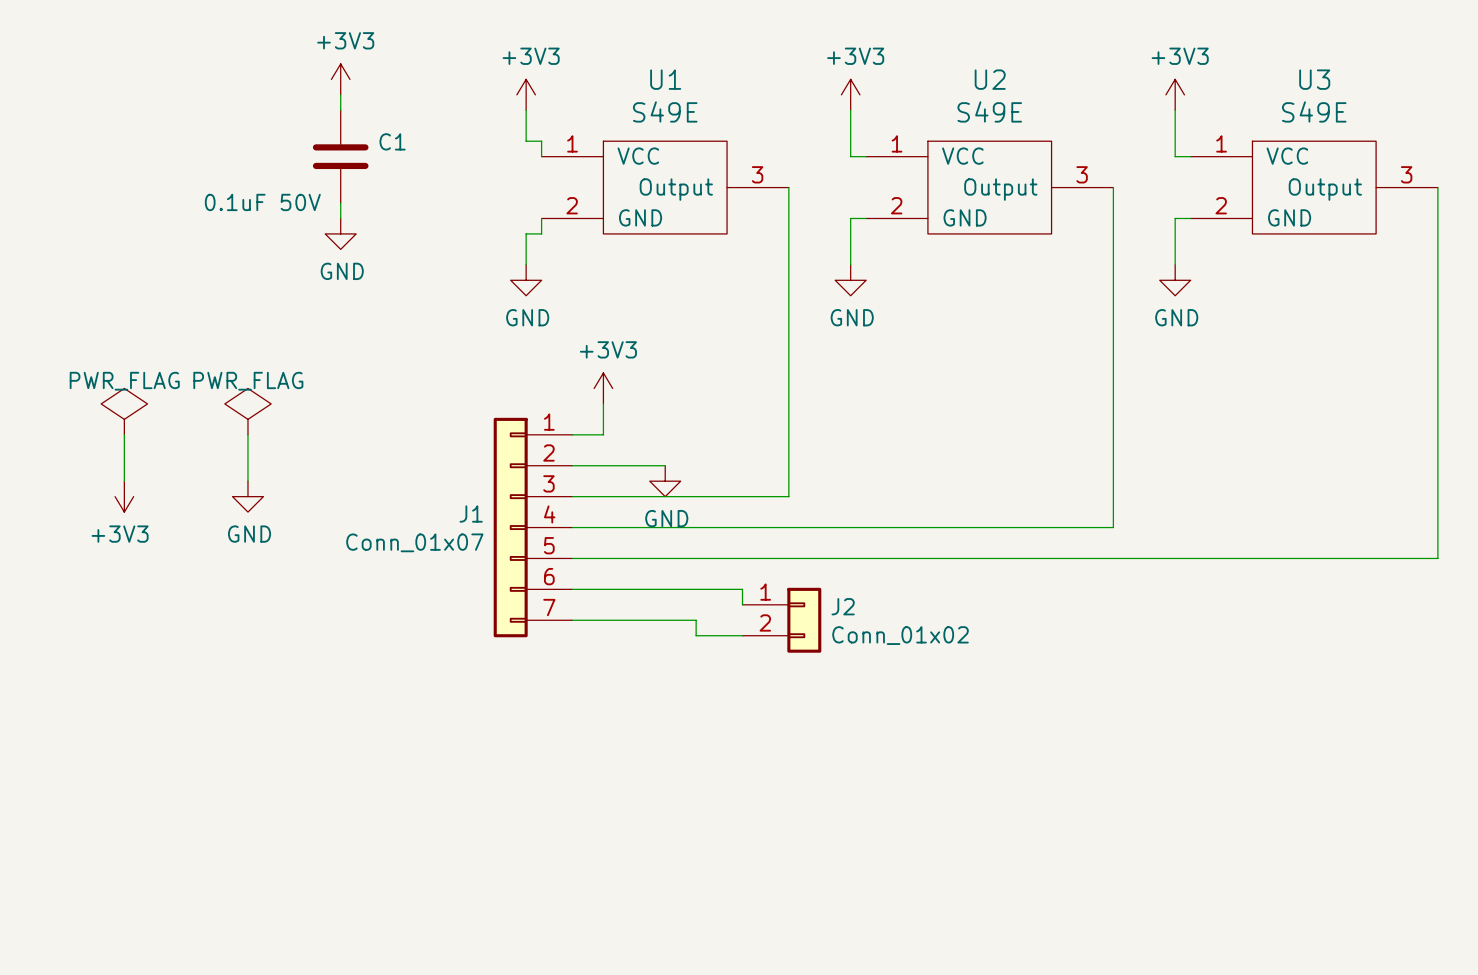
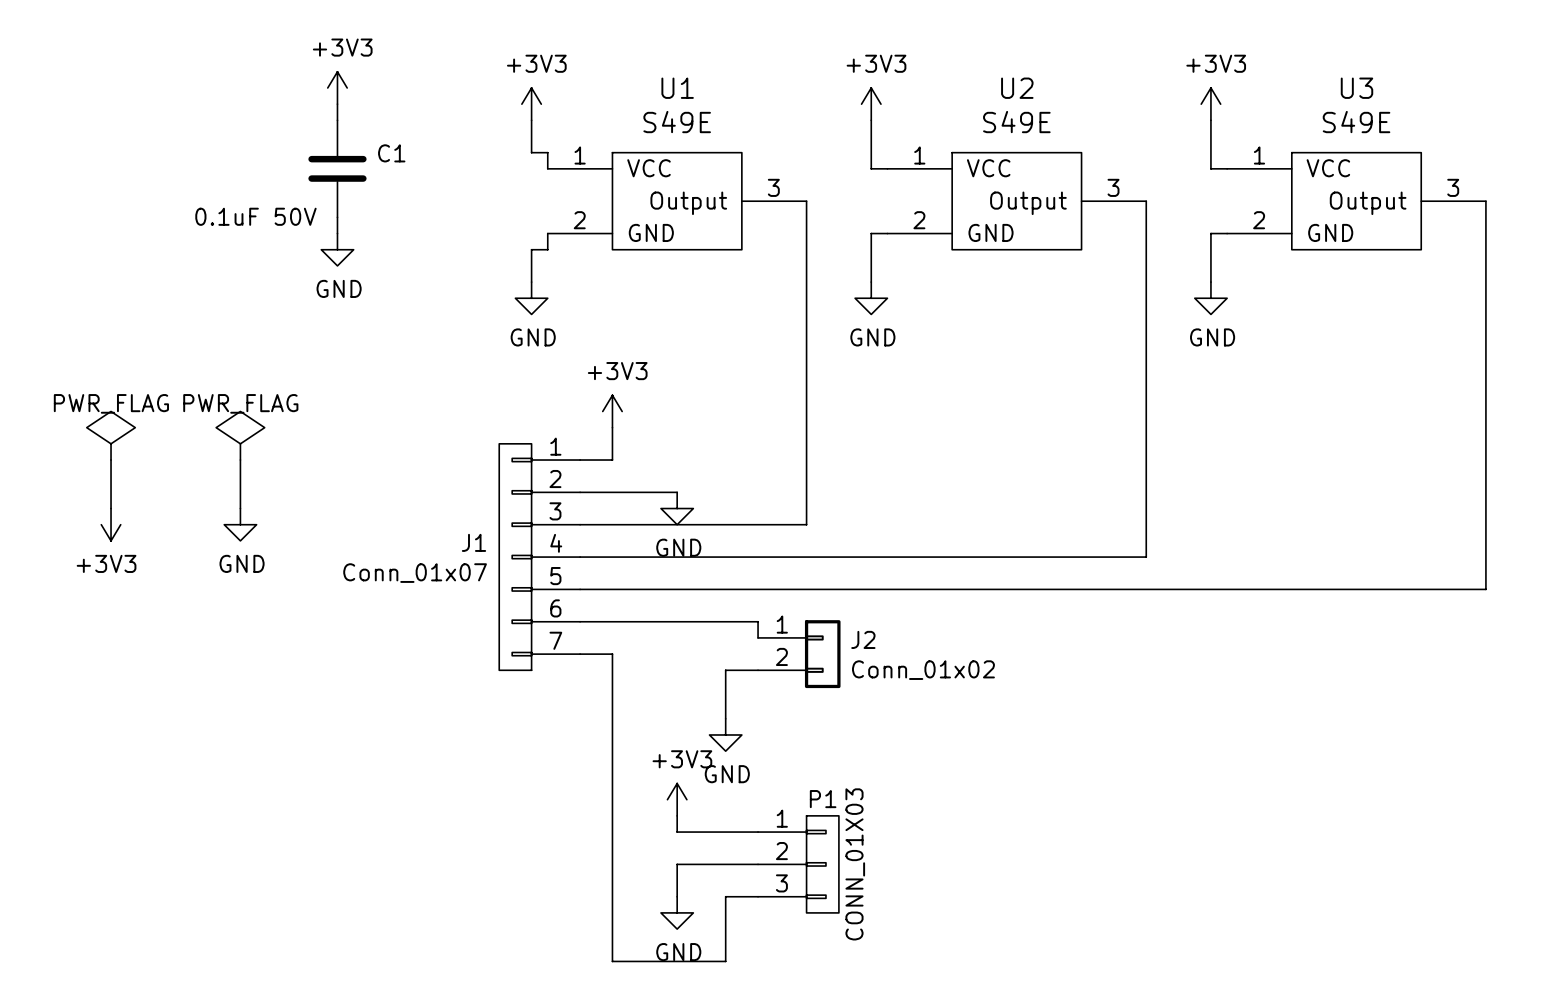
J1 symbol: [493, 417, 573, 638] -> [499, 443, 581, 671]
wire: (603, 620) (696, 620) (696, 635) (711, 635) -> (725, 718) (725, 670)
wire: none -> (612, 654) (612, 961) (725, 961) (725, 896) (758, 896)
power symbol: none -> GND (725, 734)
power symbol: none -> +3V3 (677, 799)
wire: none -> (677, 815) (677, 832) (758, 832)
wire: none -> (758, 864) (677, 864) (677, 896)
P1: none -> CONN_01X03 (798, 864)
power symbol: none -> GND (677, 912)

